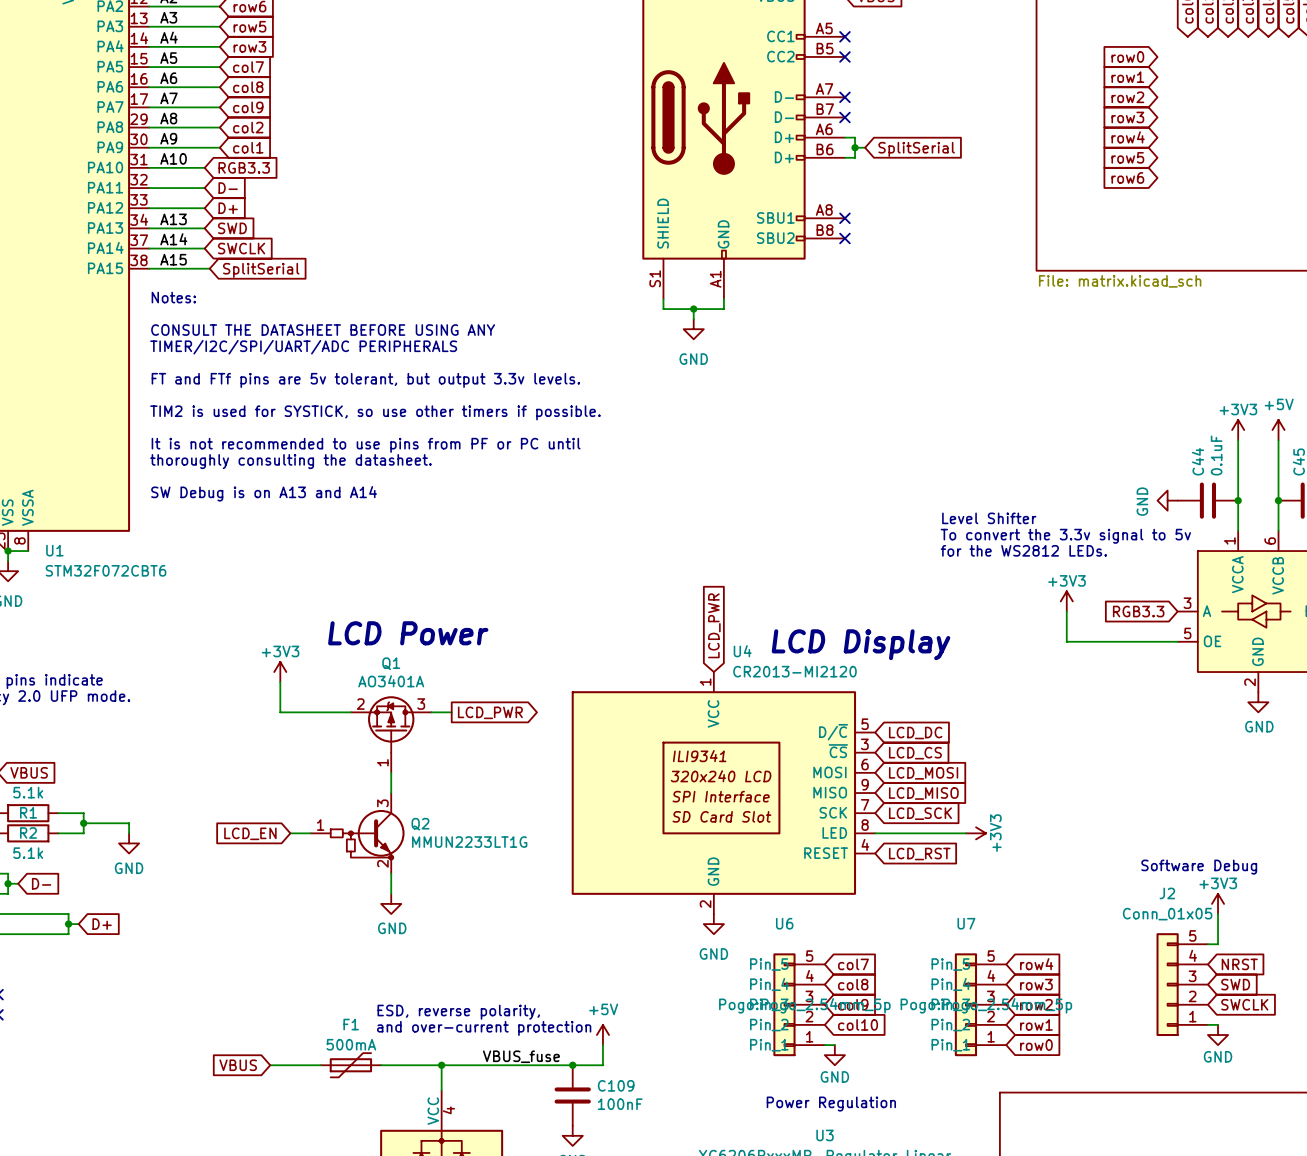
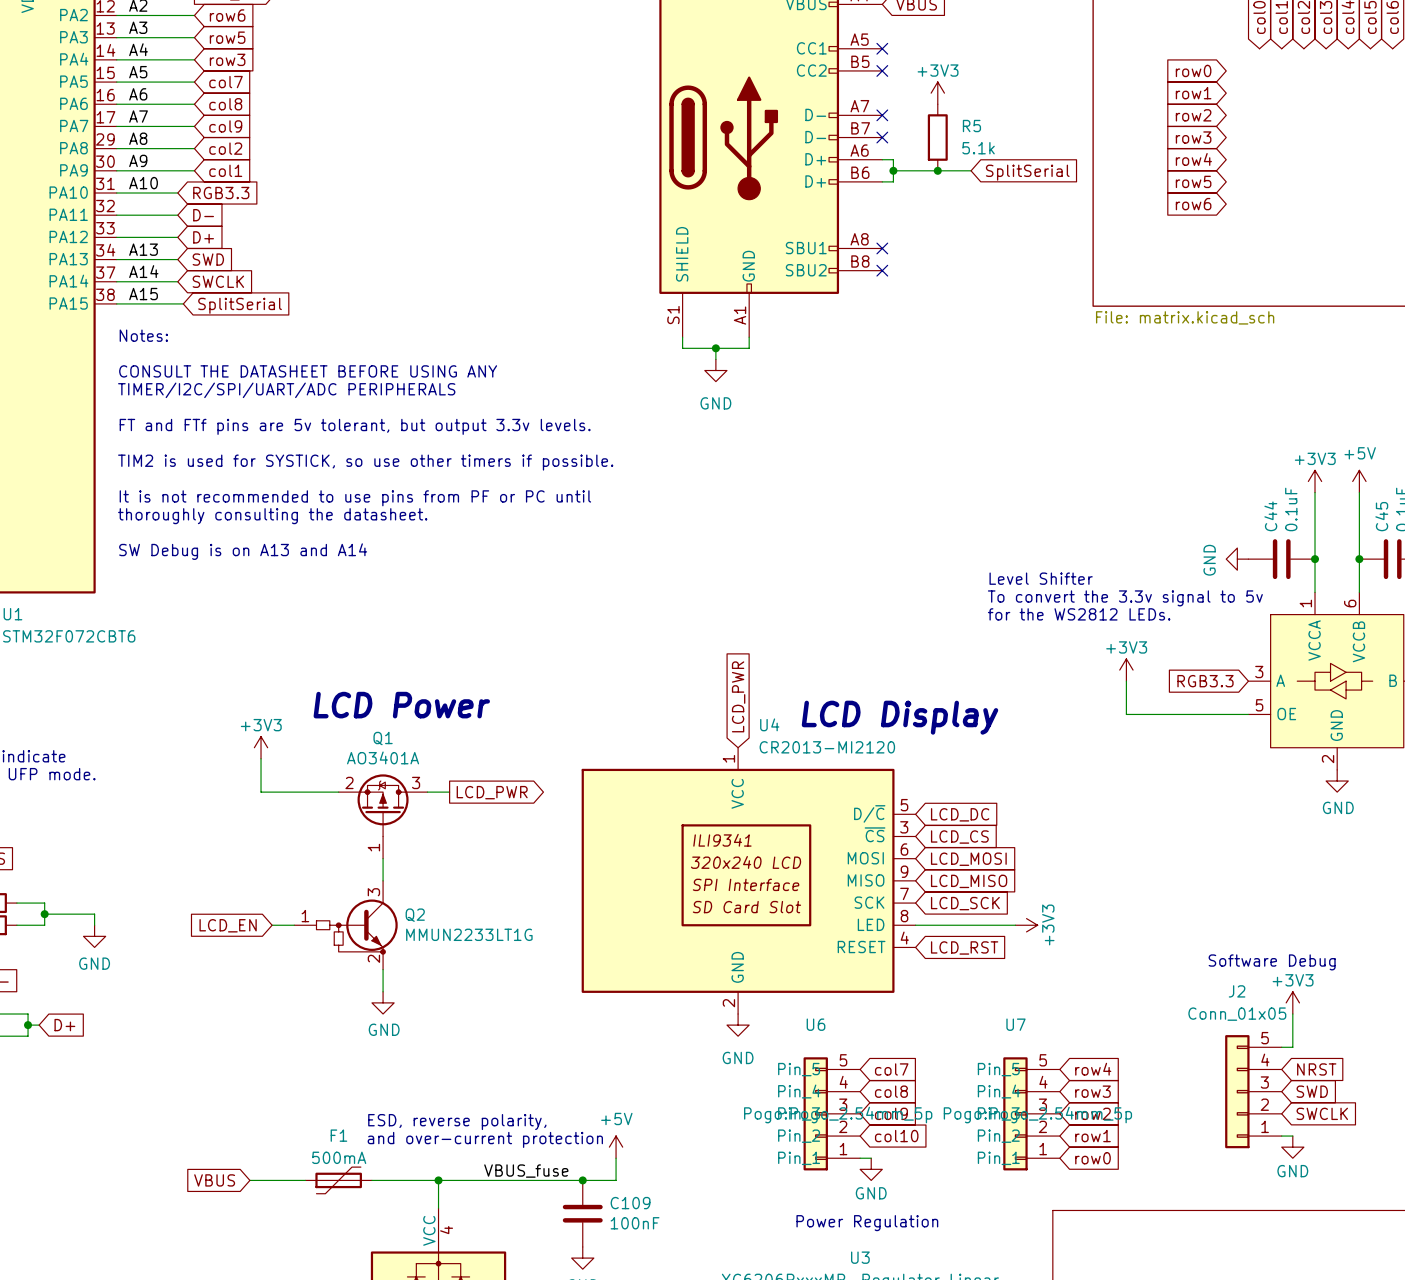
power symbol: none -> +3V3 (937, 93)
R5: none -> 5.1k (937, 137)
wire: none -> (904, 170) (971, 170)
junction: none -> (937, 170)
global label position: SplitSerial (916, 149) -> SplitSerial (1027, 172)

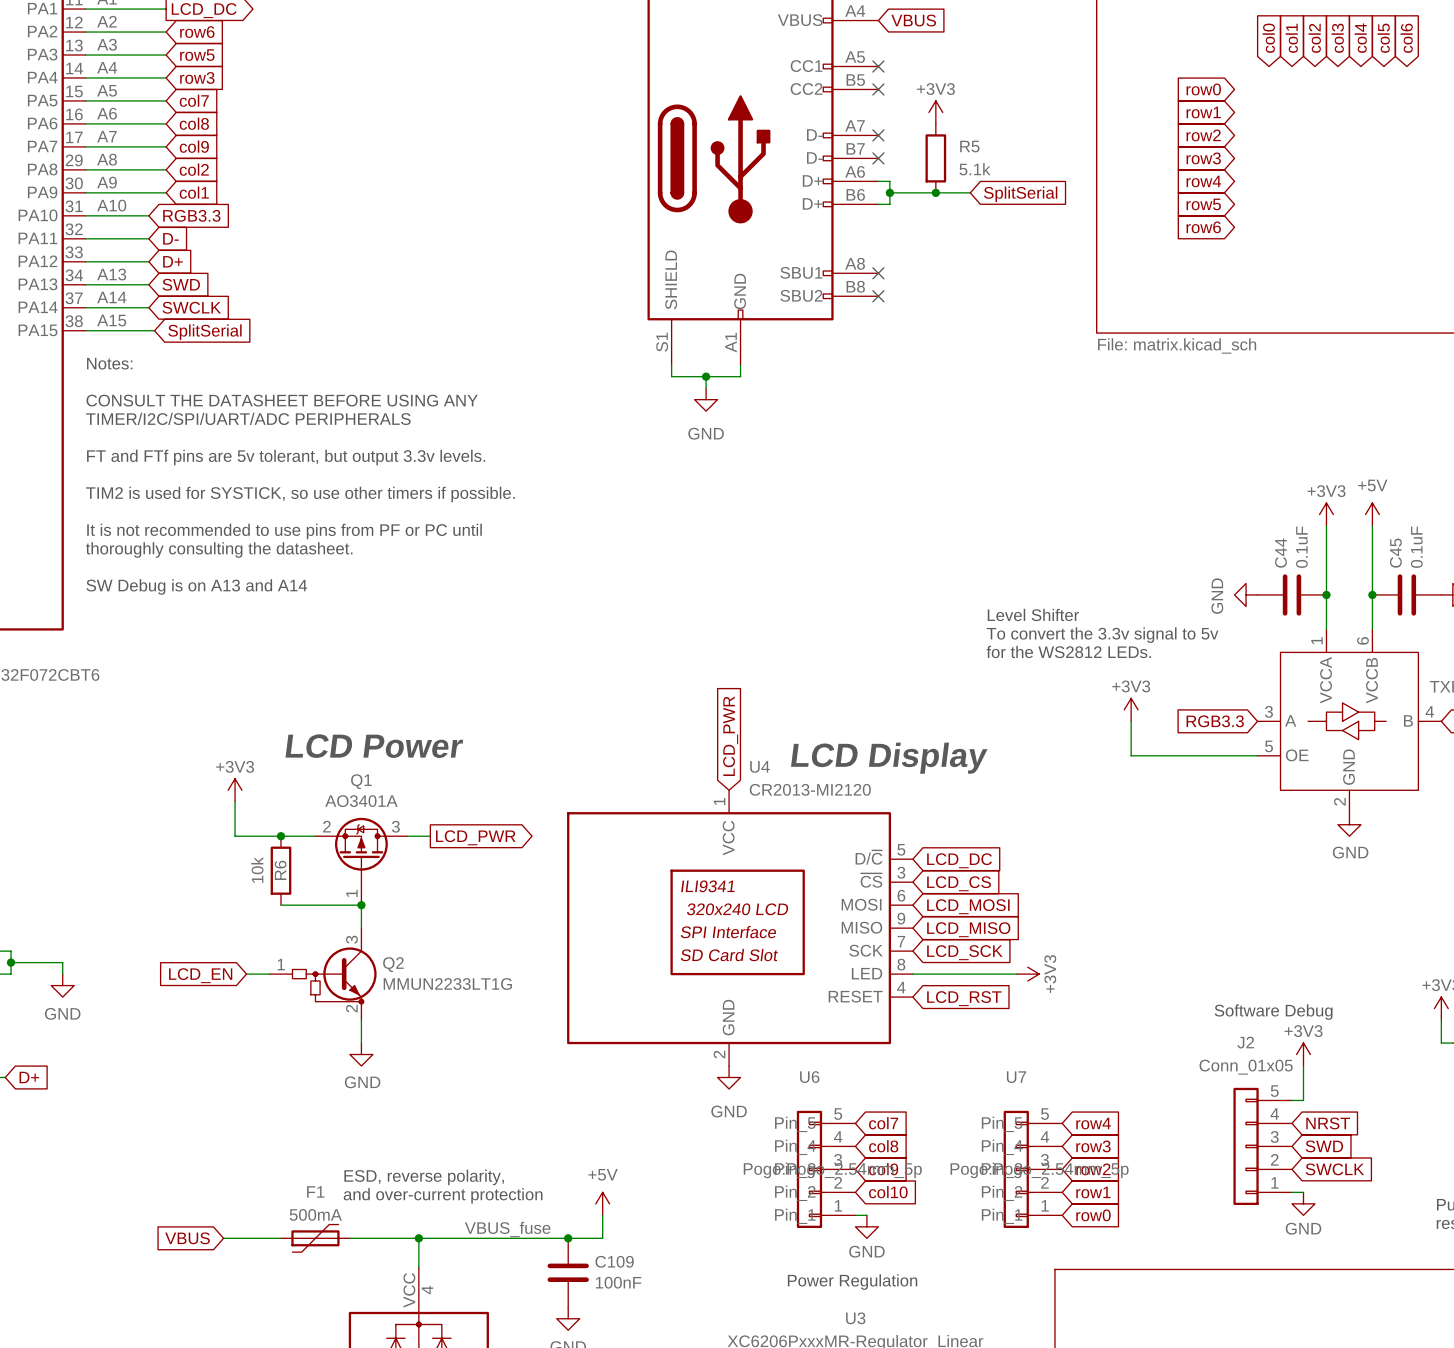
junction: none -> (281, 836)
R6: none -> 10k (281, 870)
wire: none -> (281, 905) (361, 905)
junction: none -> (361, 905)

